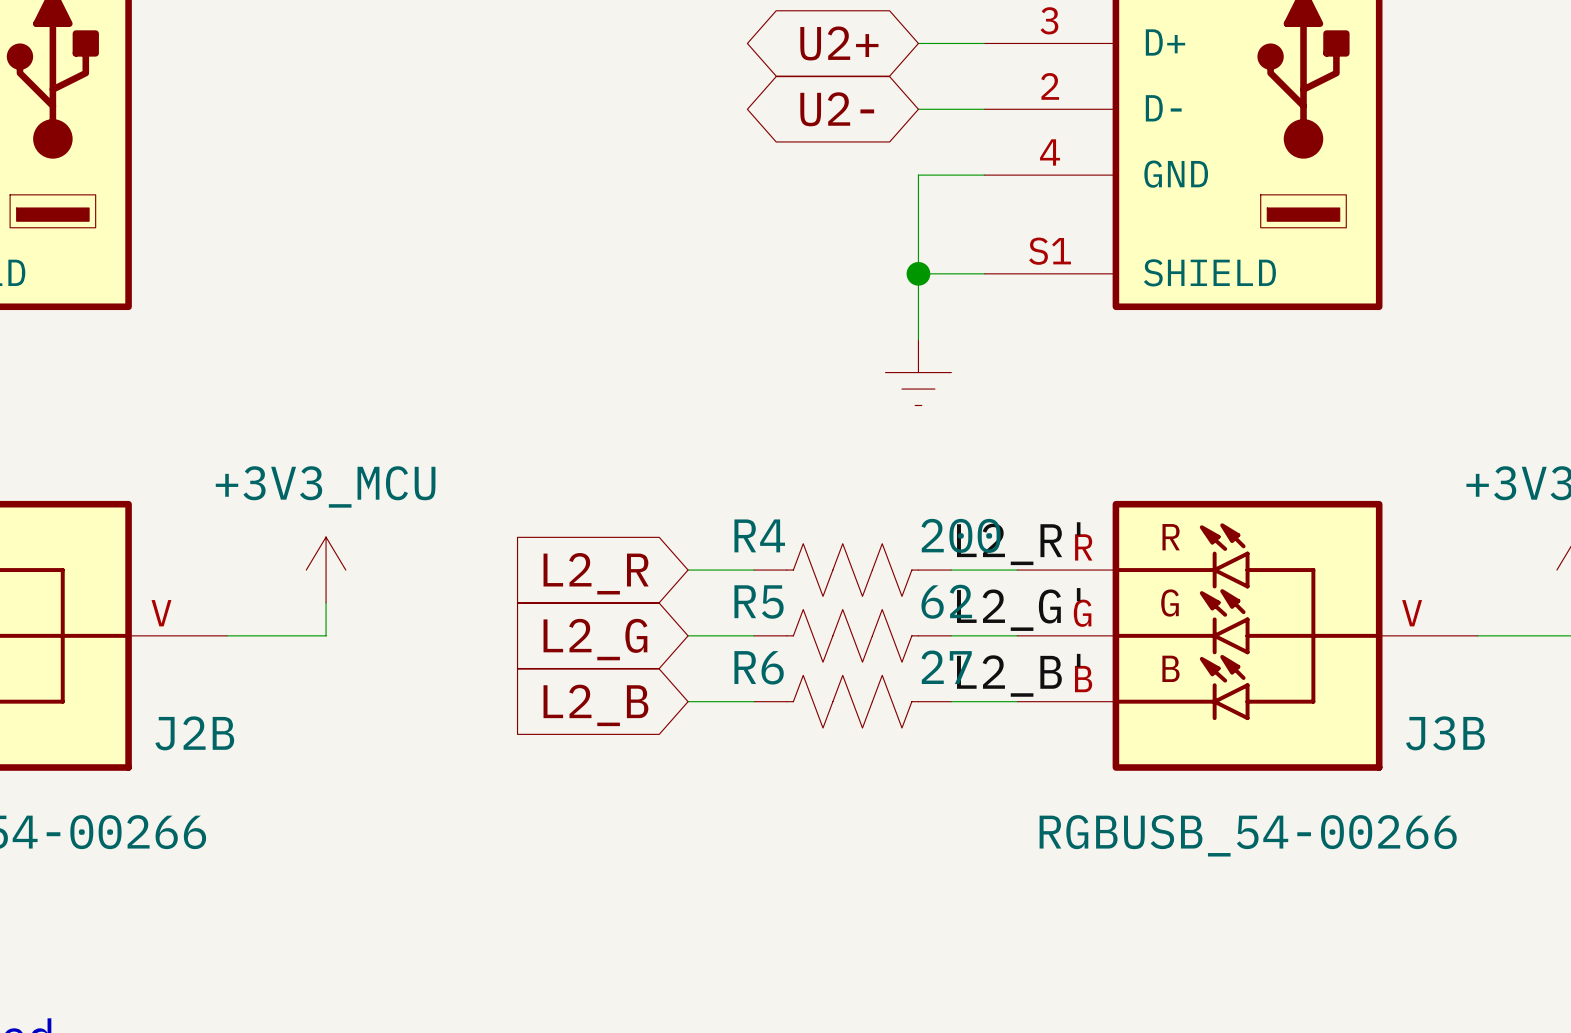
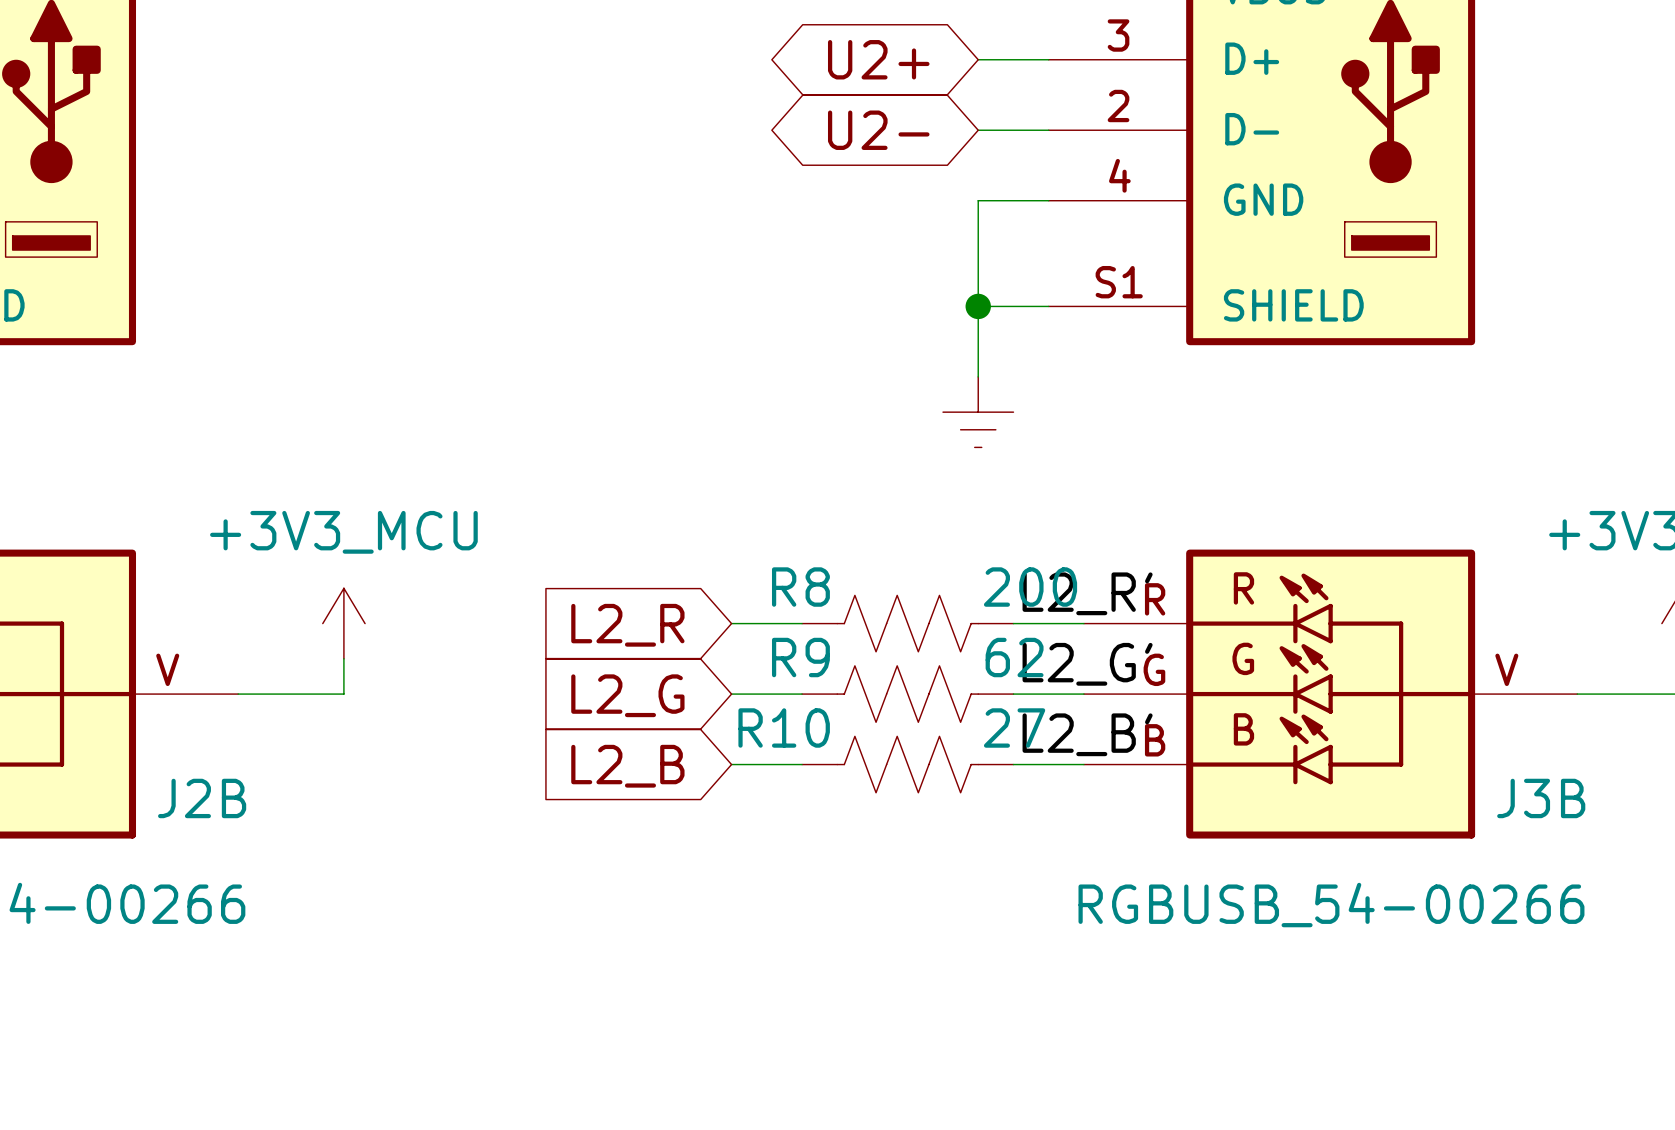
R4 name: R4 (759, 535) -> R8 (800, 587)
R5 name: R5 (759, 602) -> R9 (800, 657)
R6 name: R6 (759, 667) -> R10 (784, 727)

